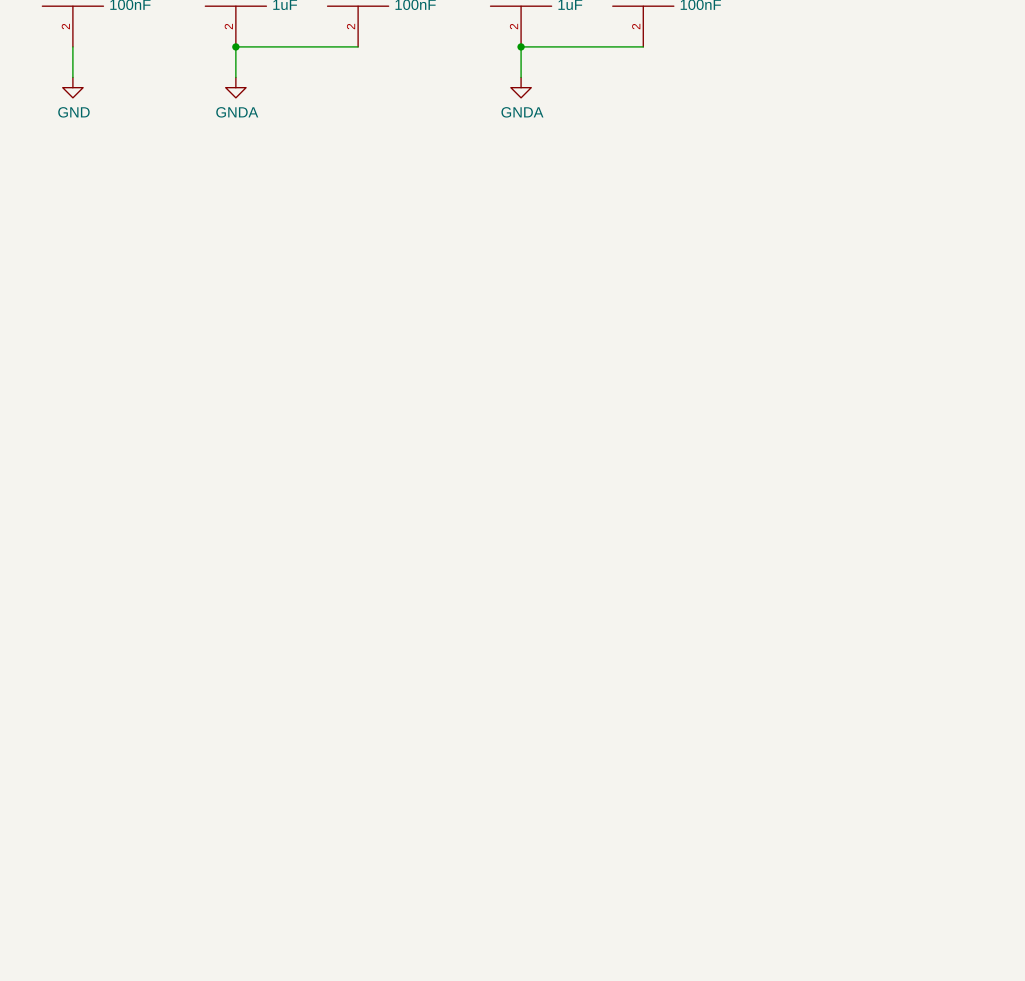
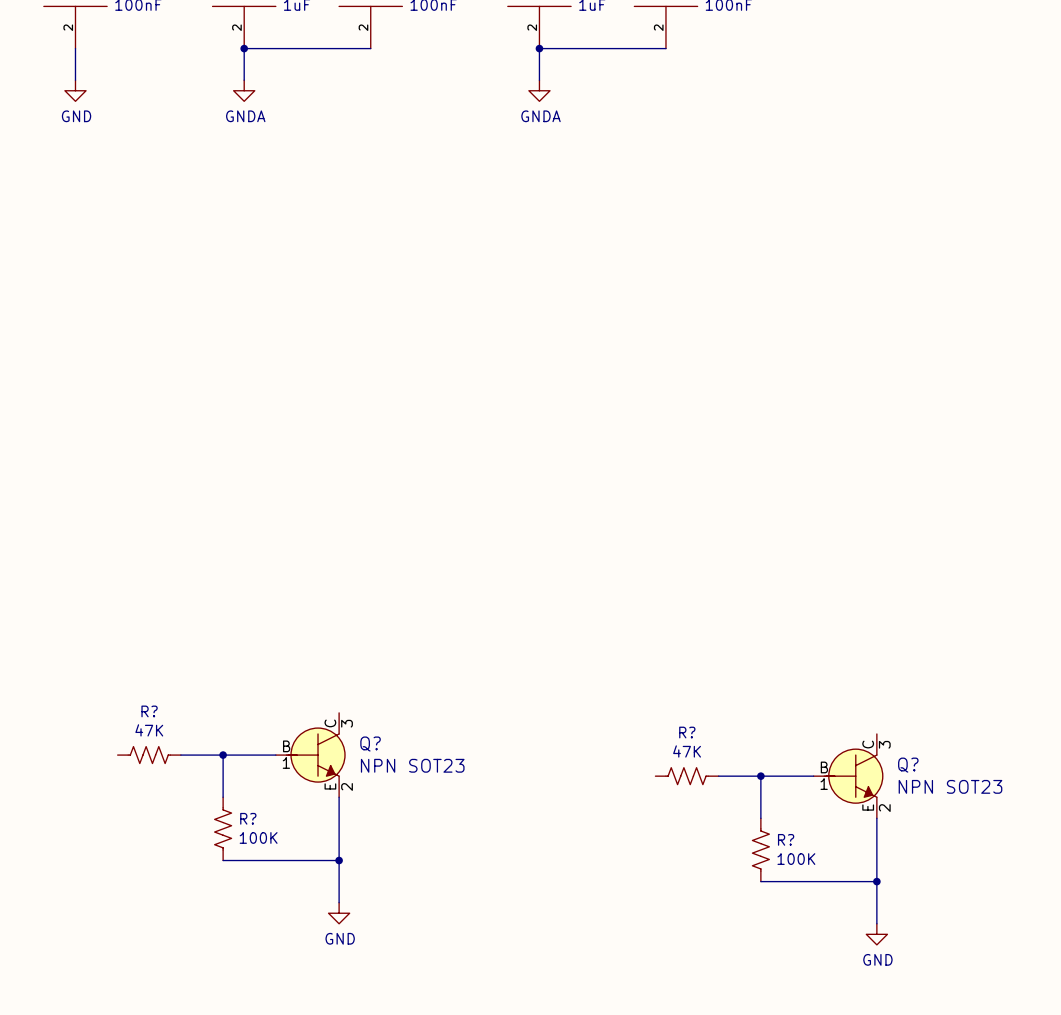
R?: none -> 47K (149, 755)
wire: none -> (180, 755) (275, 755)
wire: none -> (223, 755) (223, 797)
junction: none -> (223, 755)
Q?: none -> NPN SOT23 (310, 755)
R?: none -> 47K (687, 776)
wire: none -> (718, 776) (813, 776)
wire: none -> (760, 776) (760, 818)
junction: none -> (760, 776)
Q?: none -> NPN SOT23 (848, 776)
wire: none -> (339, 797) (339, 902)
wire: none -> (876, 818) (876, 923)
R?: none -> 100K (223, 828)
R?: none -> 100K (760, 849)
wire: none -> (223, 860) (339, 860)
junction: none -> (339, 860)
wire: none -> (760, 881) (876, 881)
junction: none -> (876, 881)
power symbol: none -> GND (339, 913)
power symbol: none -> GND (876, 934)

